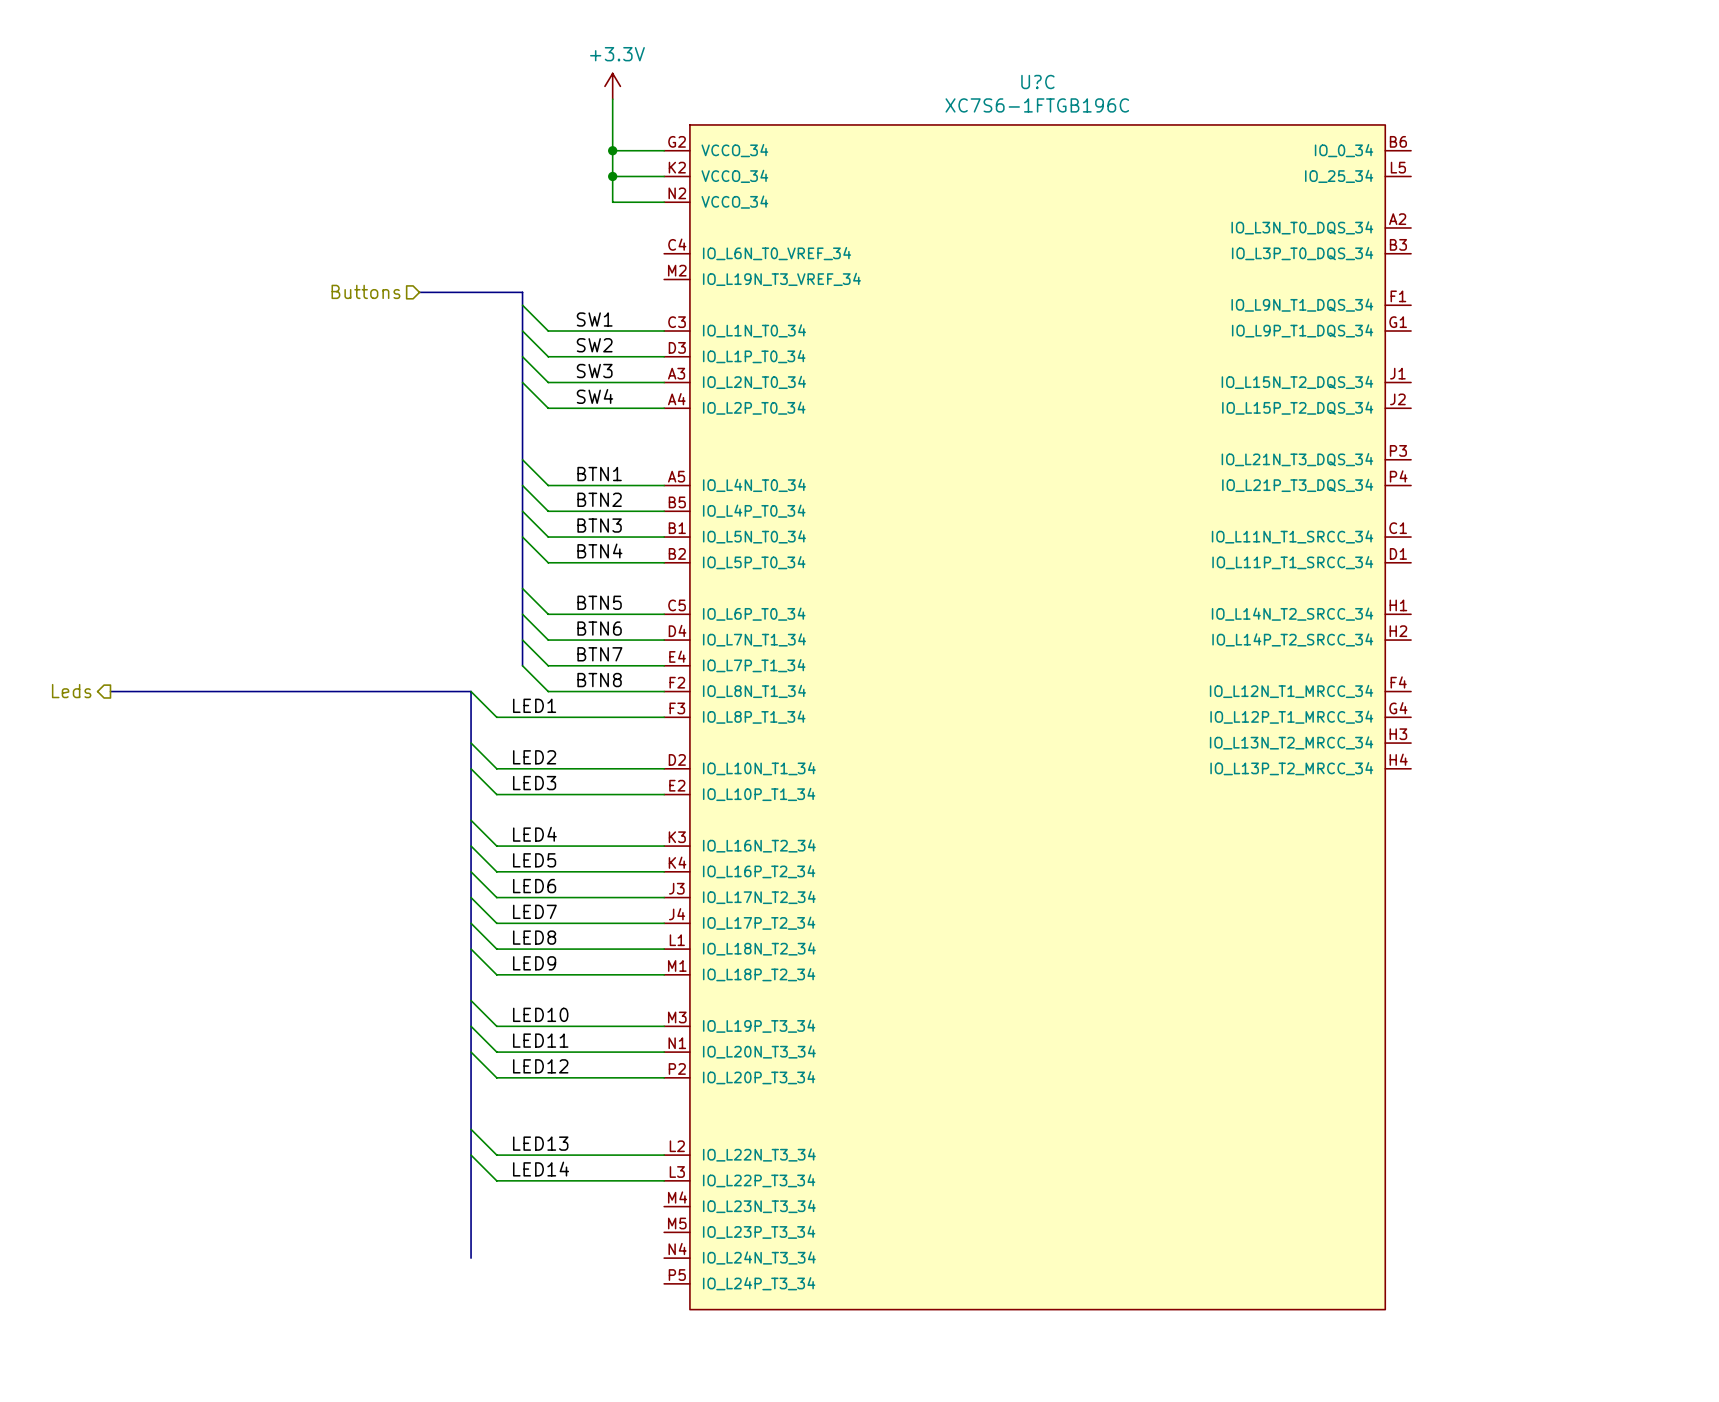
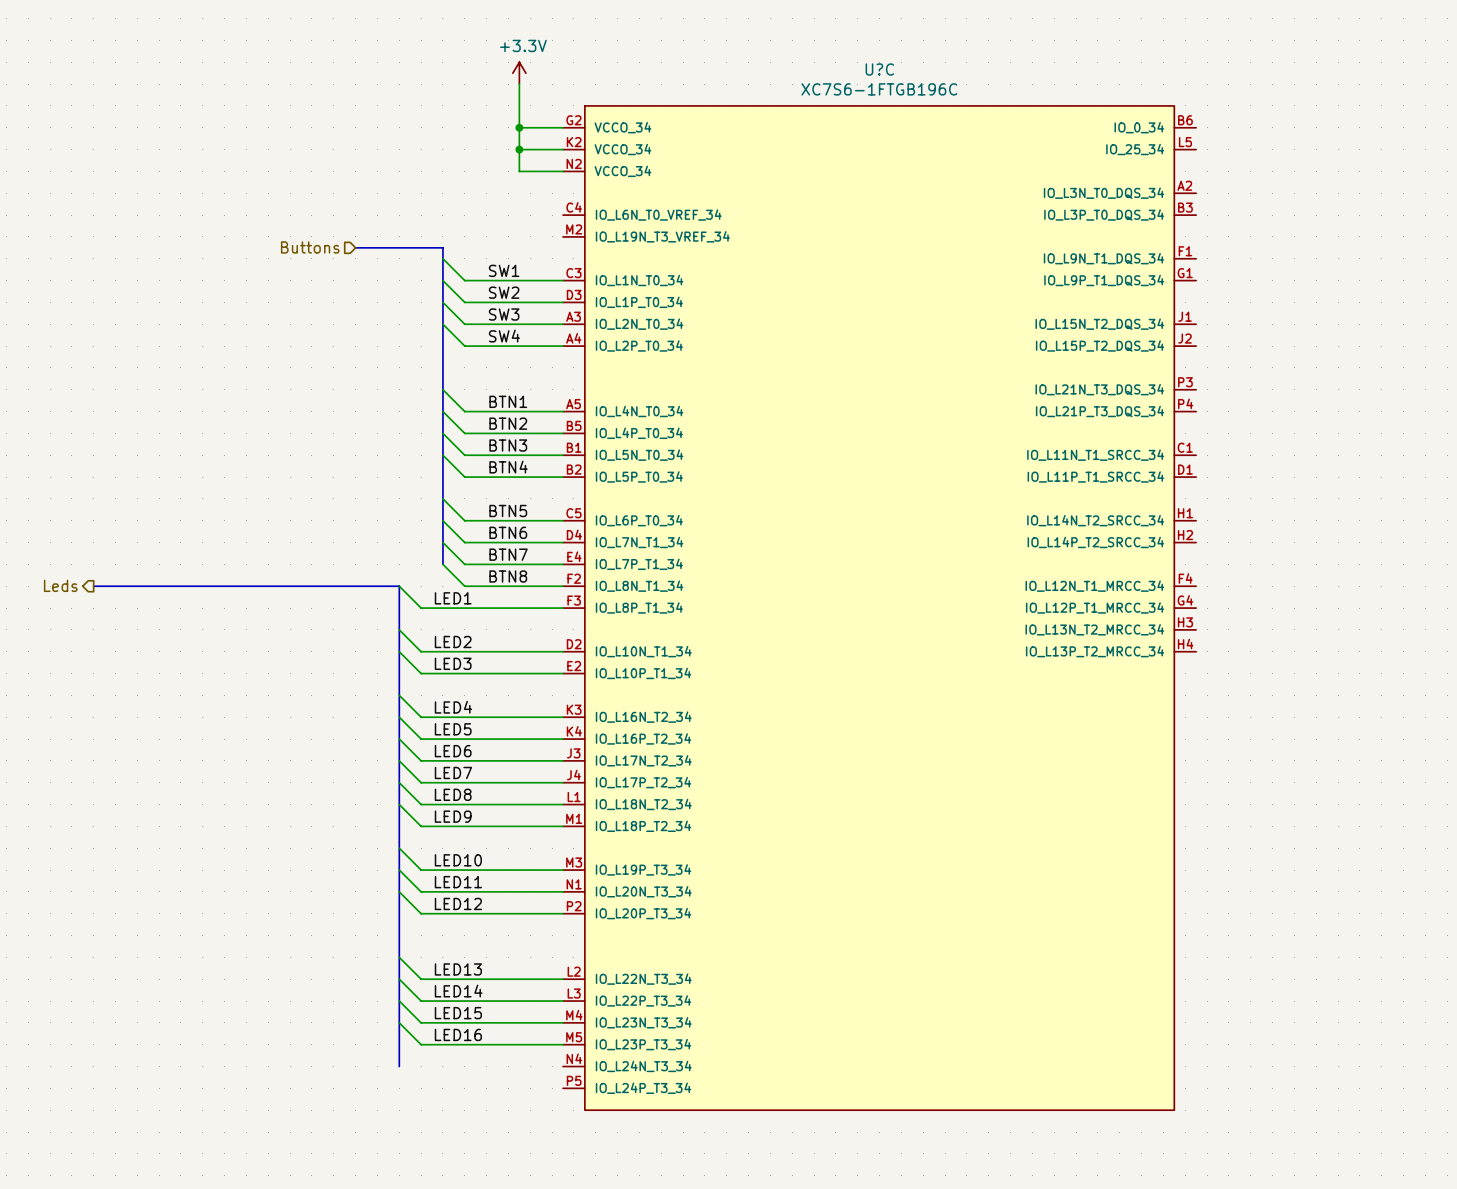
wire: none -> (399, 1001) (421, 1022) (563, 1022)
label: none -> LED15 (458, 1013)
wire: none -> (399, 1022) (421, 1044) (563, 1044)
label: none -> LED16 (458, 1034)

